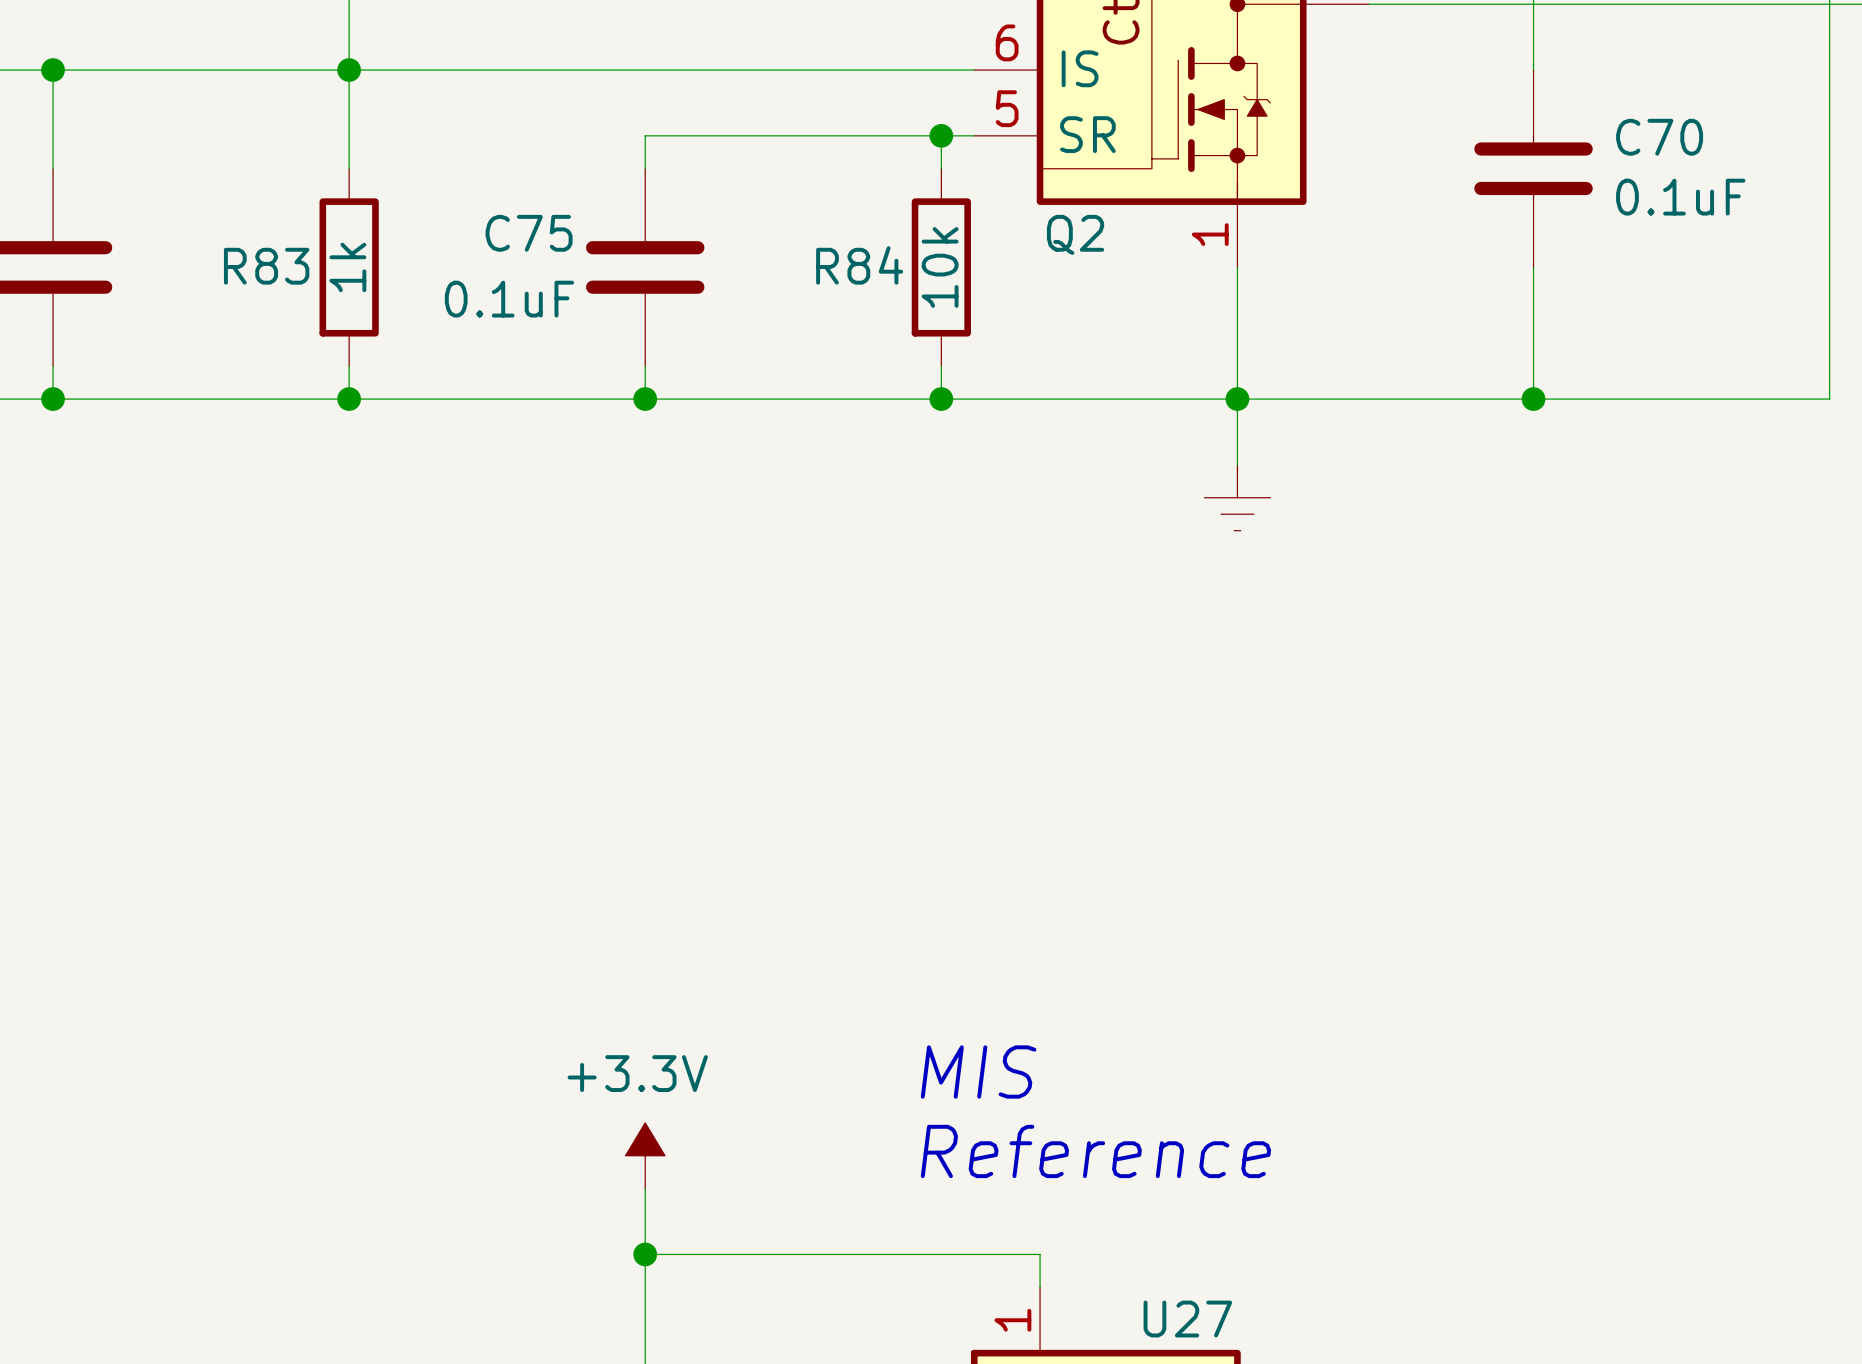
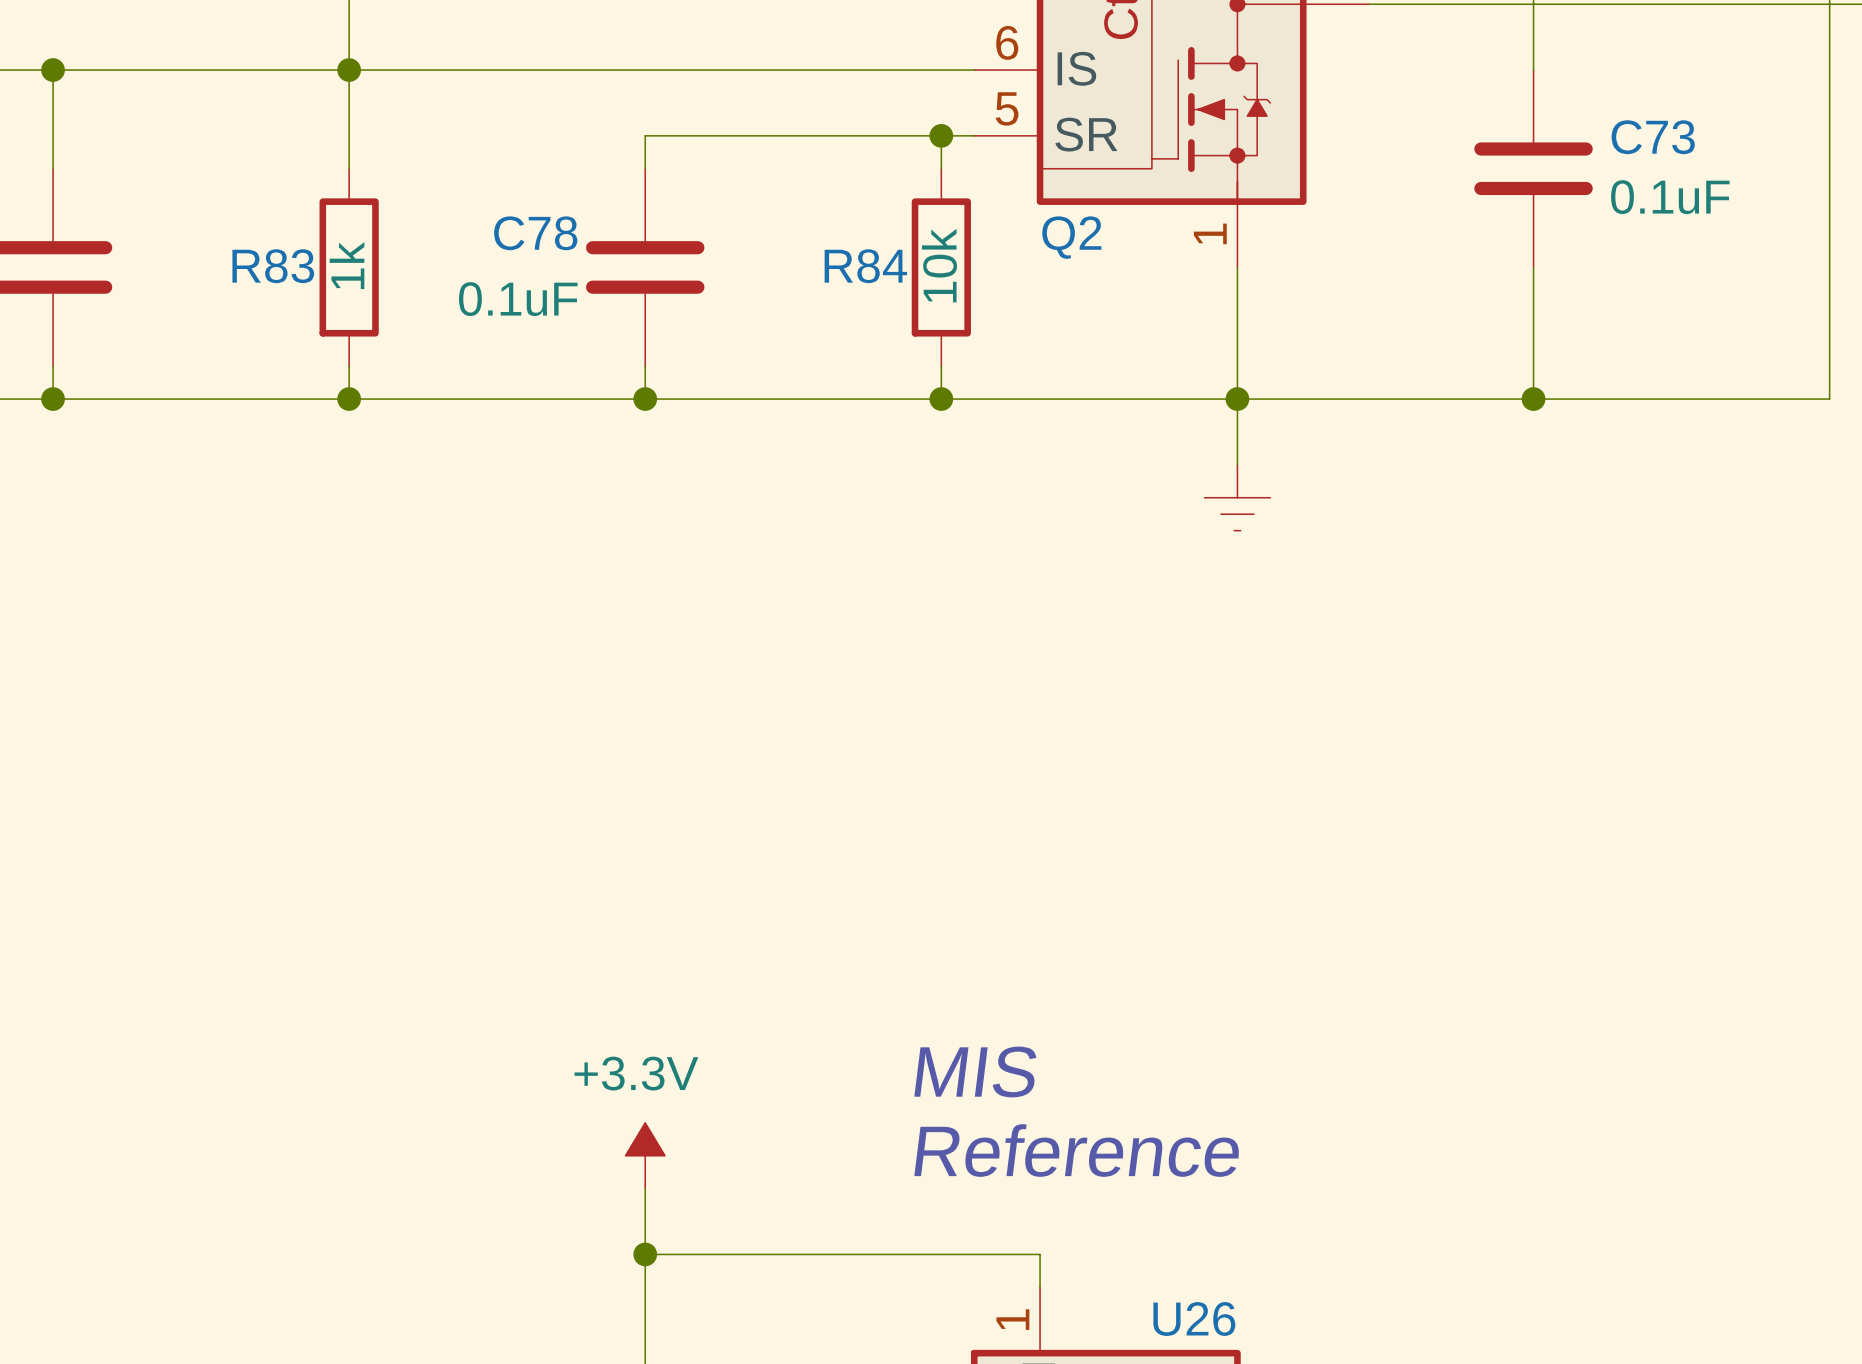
C70 name: C70 (1659, 137) -> C73 (1653, 137)
C75 name: C75 (529, 233) -> C78 (535, 233)
U27 name: U27 (1187, 1319) -> U26 (1194, 1319)

